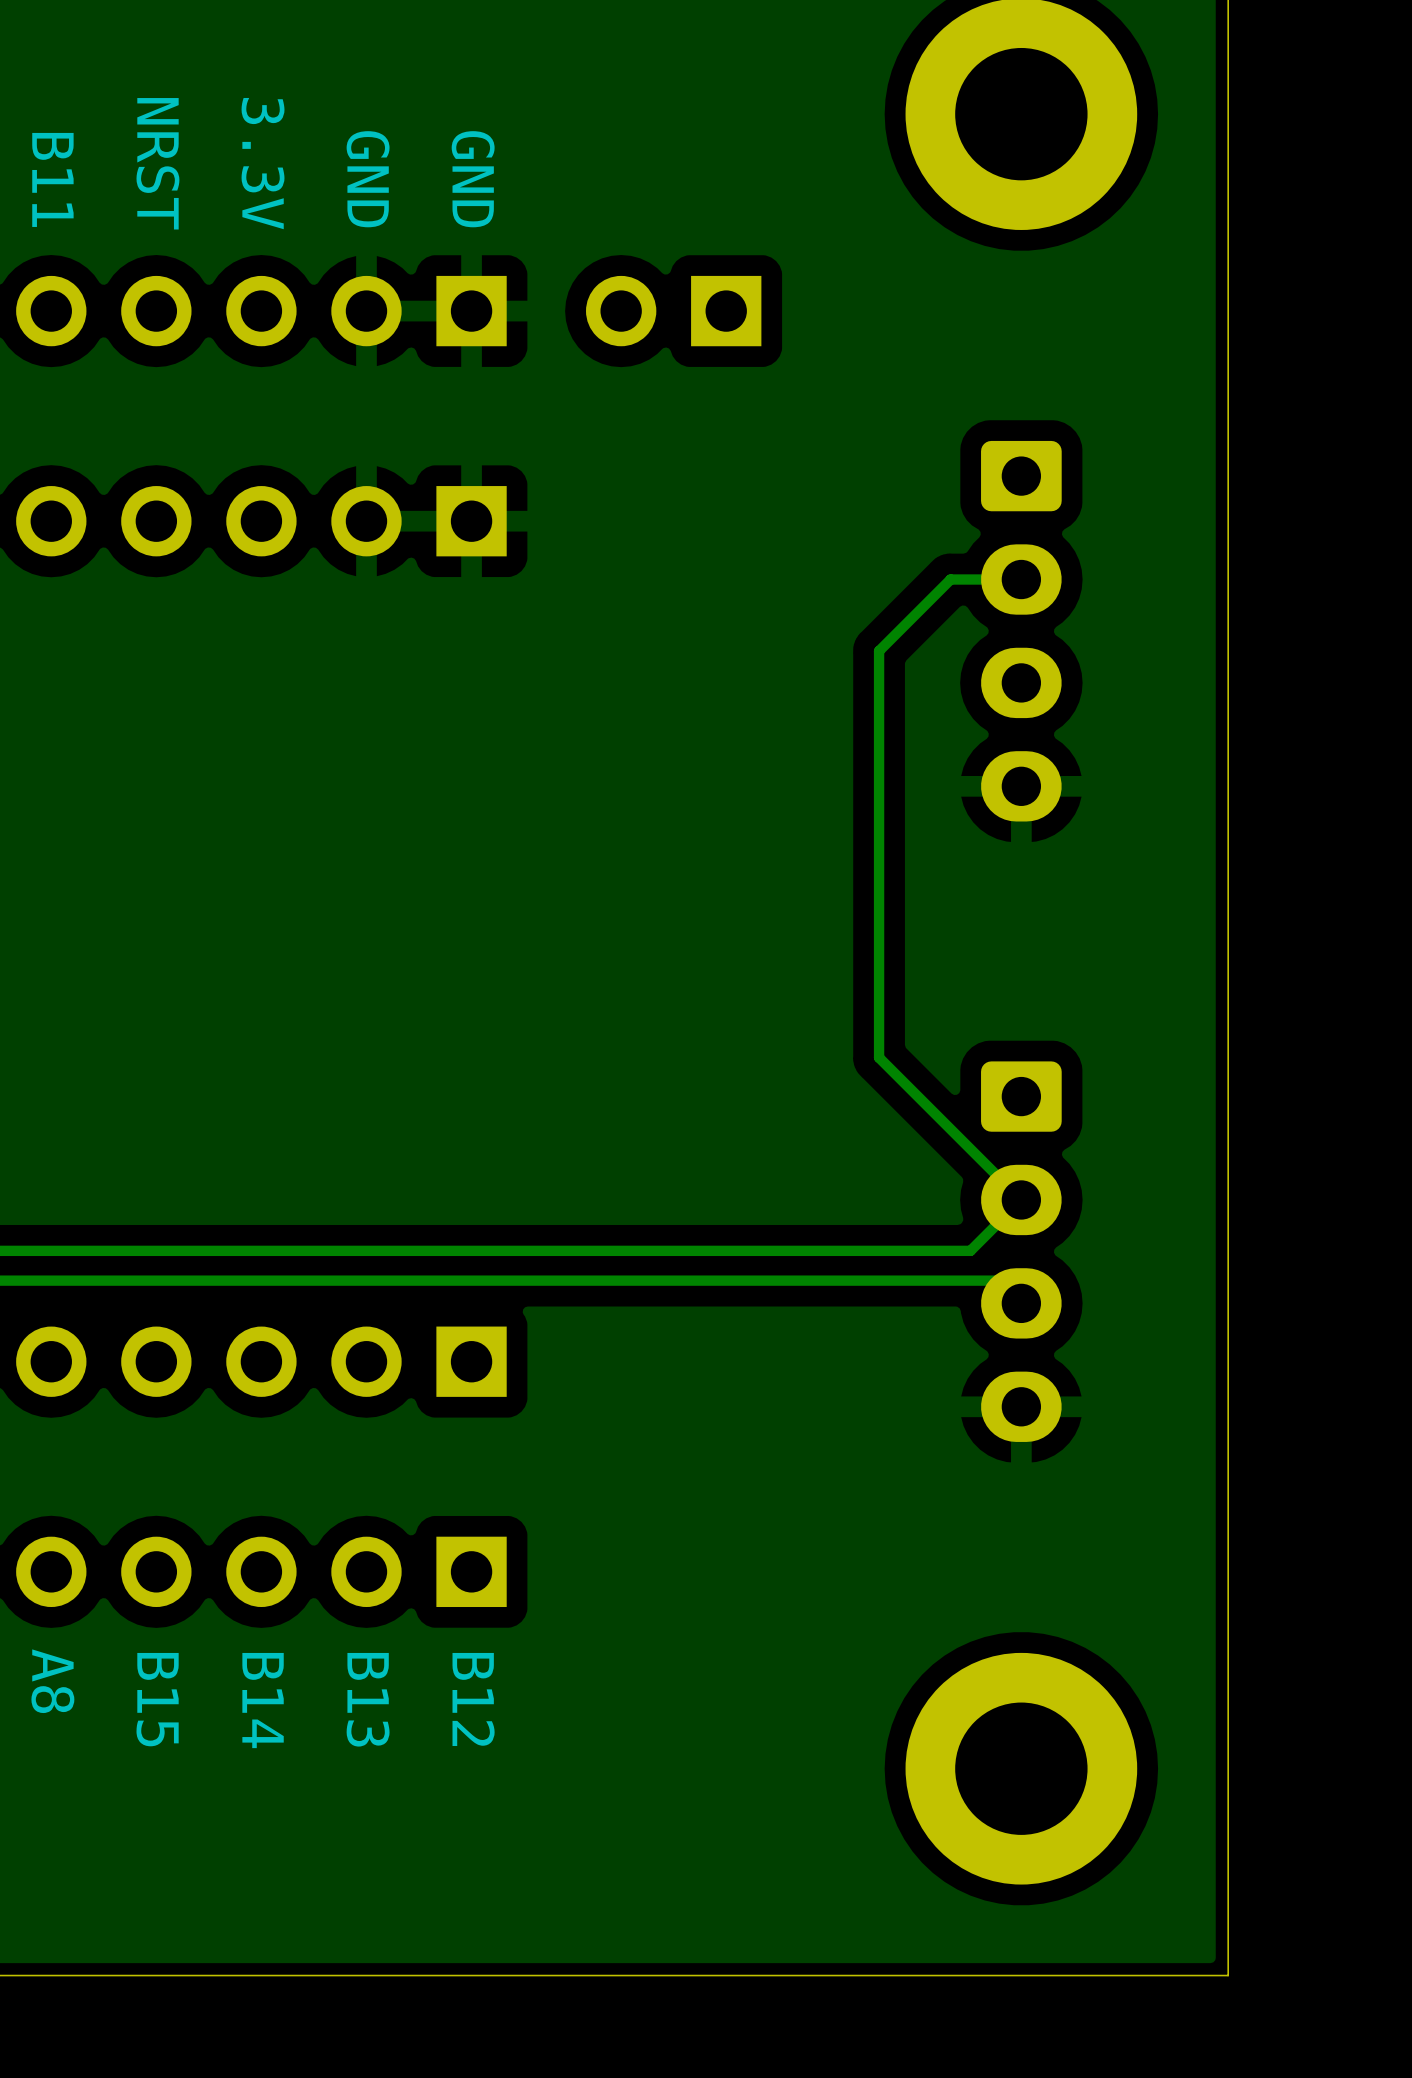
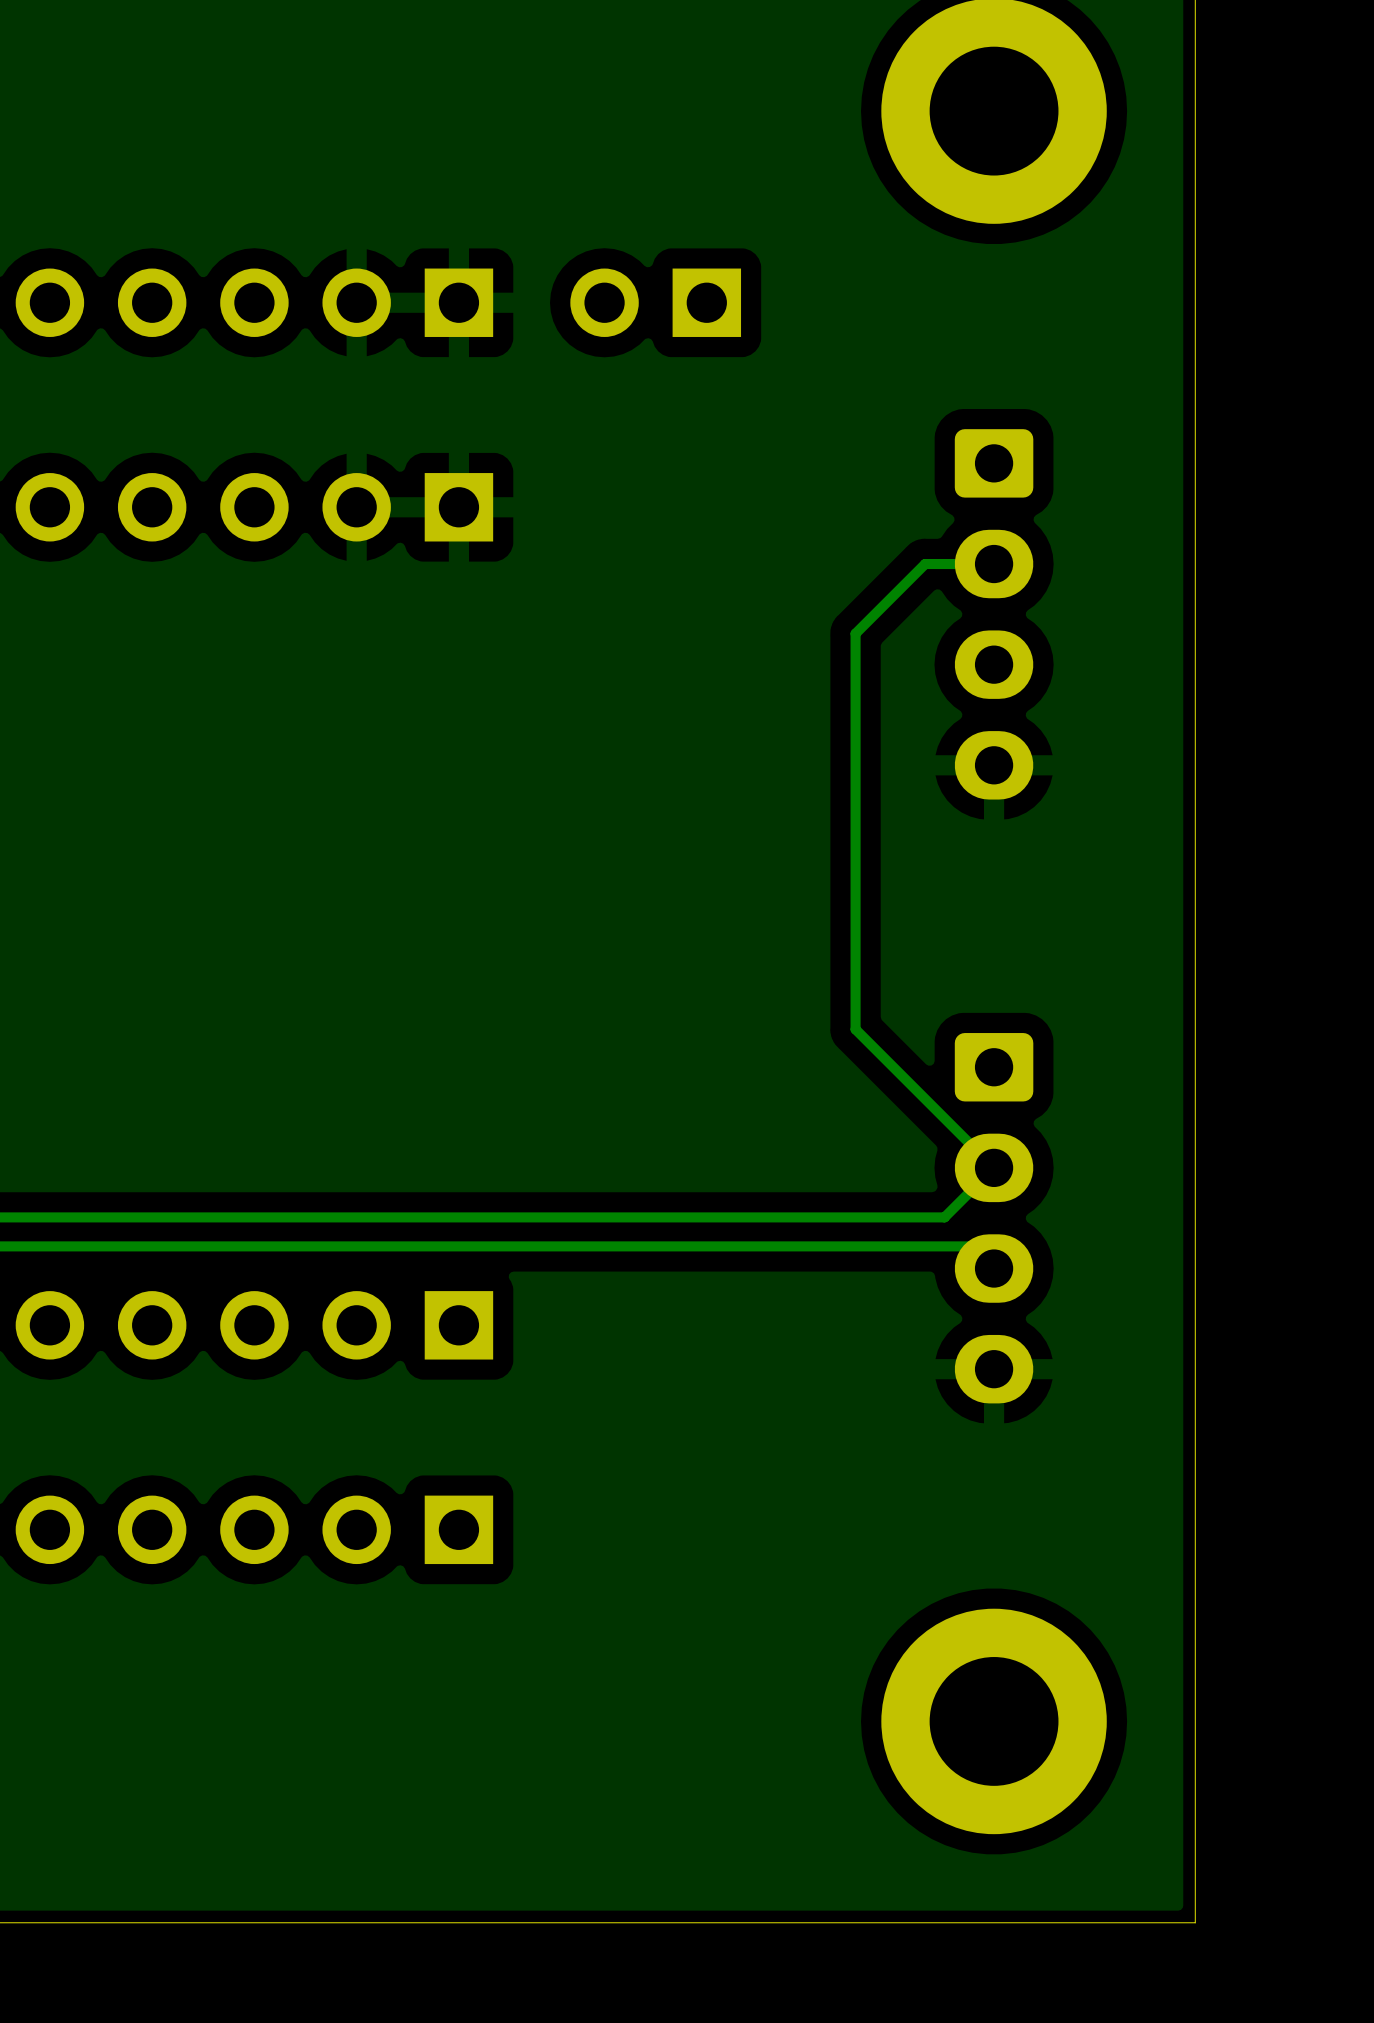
text: NRST (157, 163) -> none
text: 3.3V (263, 163) -> none
text: B11 (52, 179) -> none
text: GND (368, 179) -> none
text: GND (473, 179) -> none
text: A8 (52, 1681) -> none
text: B15 (157, 1699) -> none
text: B13 (368, 1699) -> none
text: B12 (473, 1699) -> none
text: B14 (263, 1700) -> none

